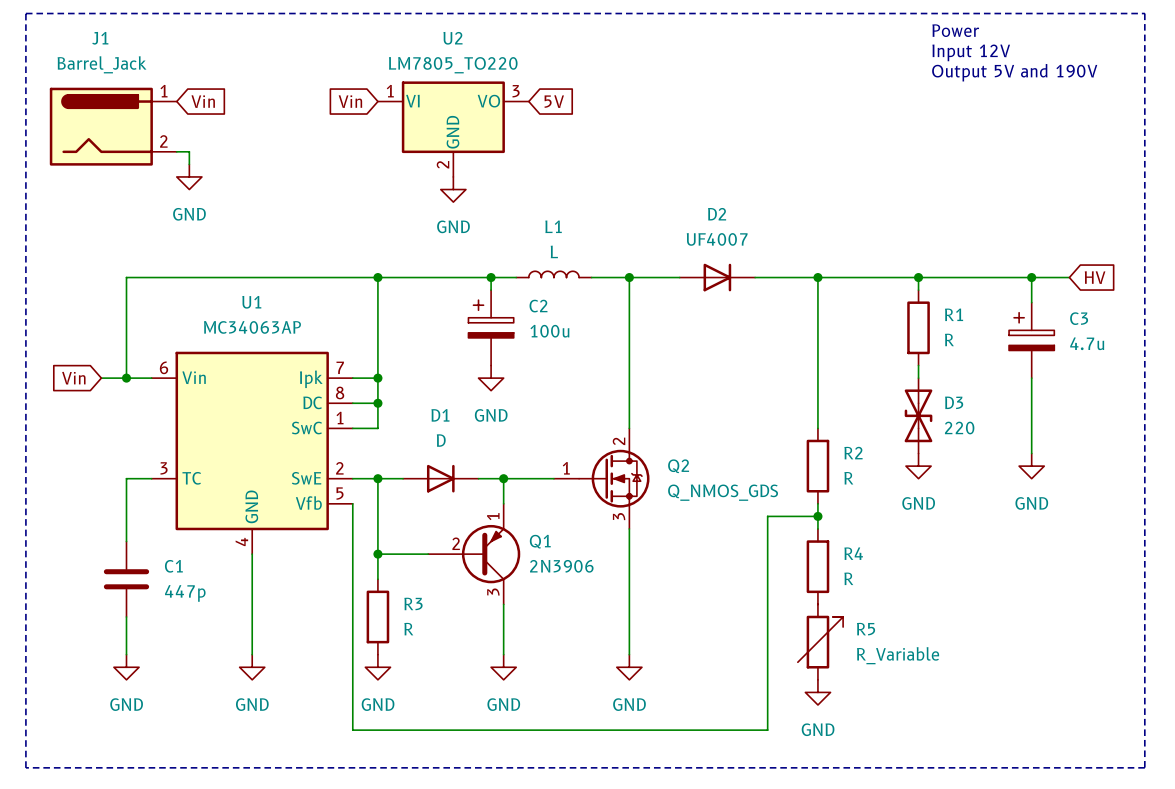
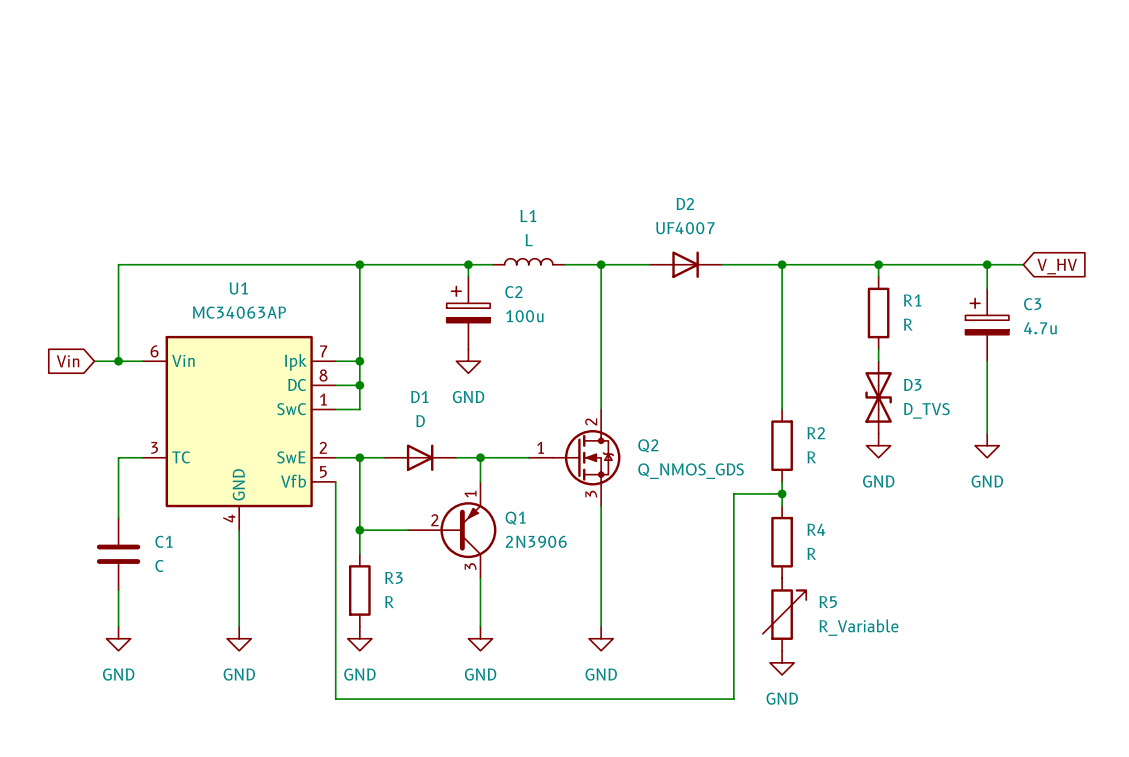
line: (25, 13) (1144, 13) (1144, 767) (25, 767) (25, 13) -> none
text: Power (955, 30) -> none
text: Input 12V (971, 52) -> none
text: Output 5V and 190V (1014, 72) -> none
global label: Vin (203, 101) -> none
global label: Vin (350, 101) -> none
global label: 5V (554, 101) -> none
J1: Barrel_Jack (113, 126) -> none
U2: LM7805_TO220 (453, 129) -> none
wire: (176, 151) (189, 151) (189, 164) -> none
power symbol: GND (189, 176) -> none
power symbol: GND (453, 189) -> none
global label: HV (1095, 277) -> V_HV (1057, 266)
D3 value: 220 (959, 428) -> D_TVS (926, 410)
C1 value: 447p (185, 593) -> C (159, 565)

